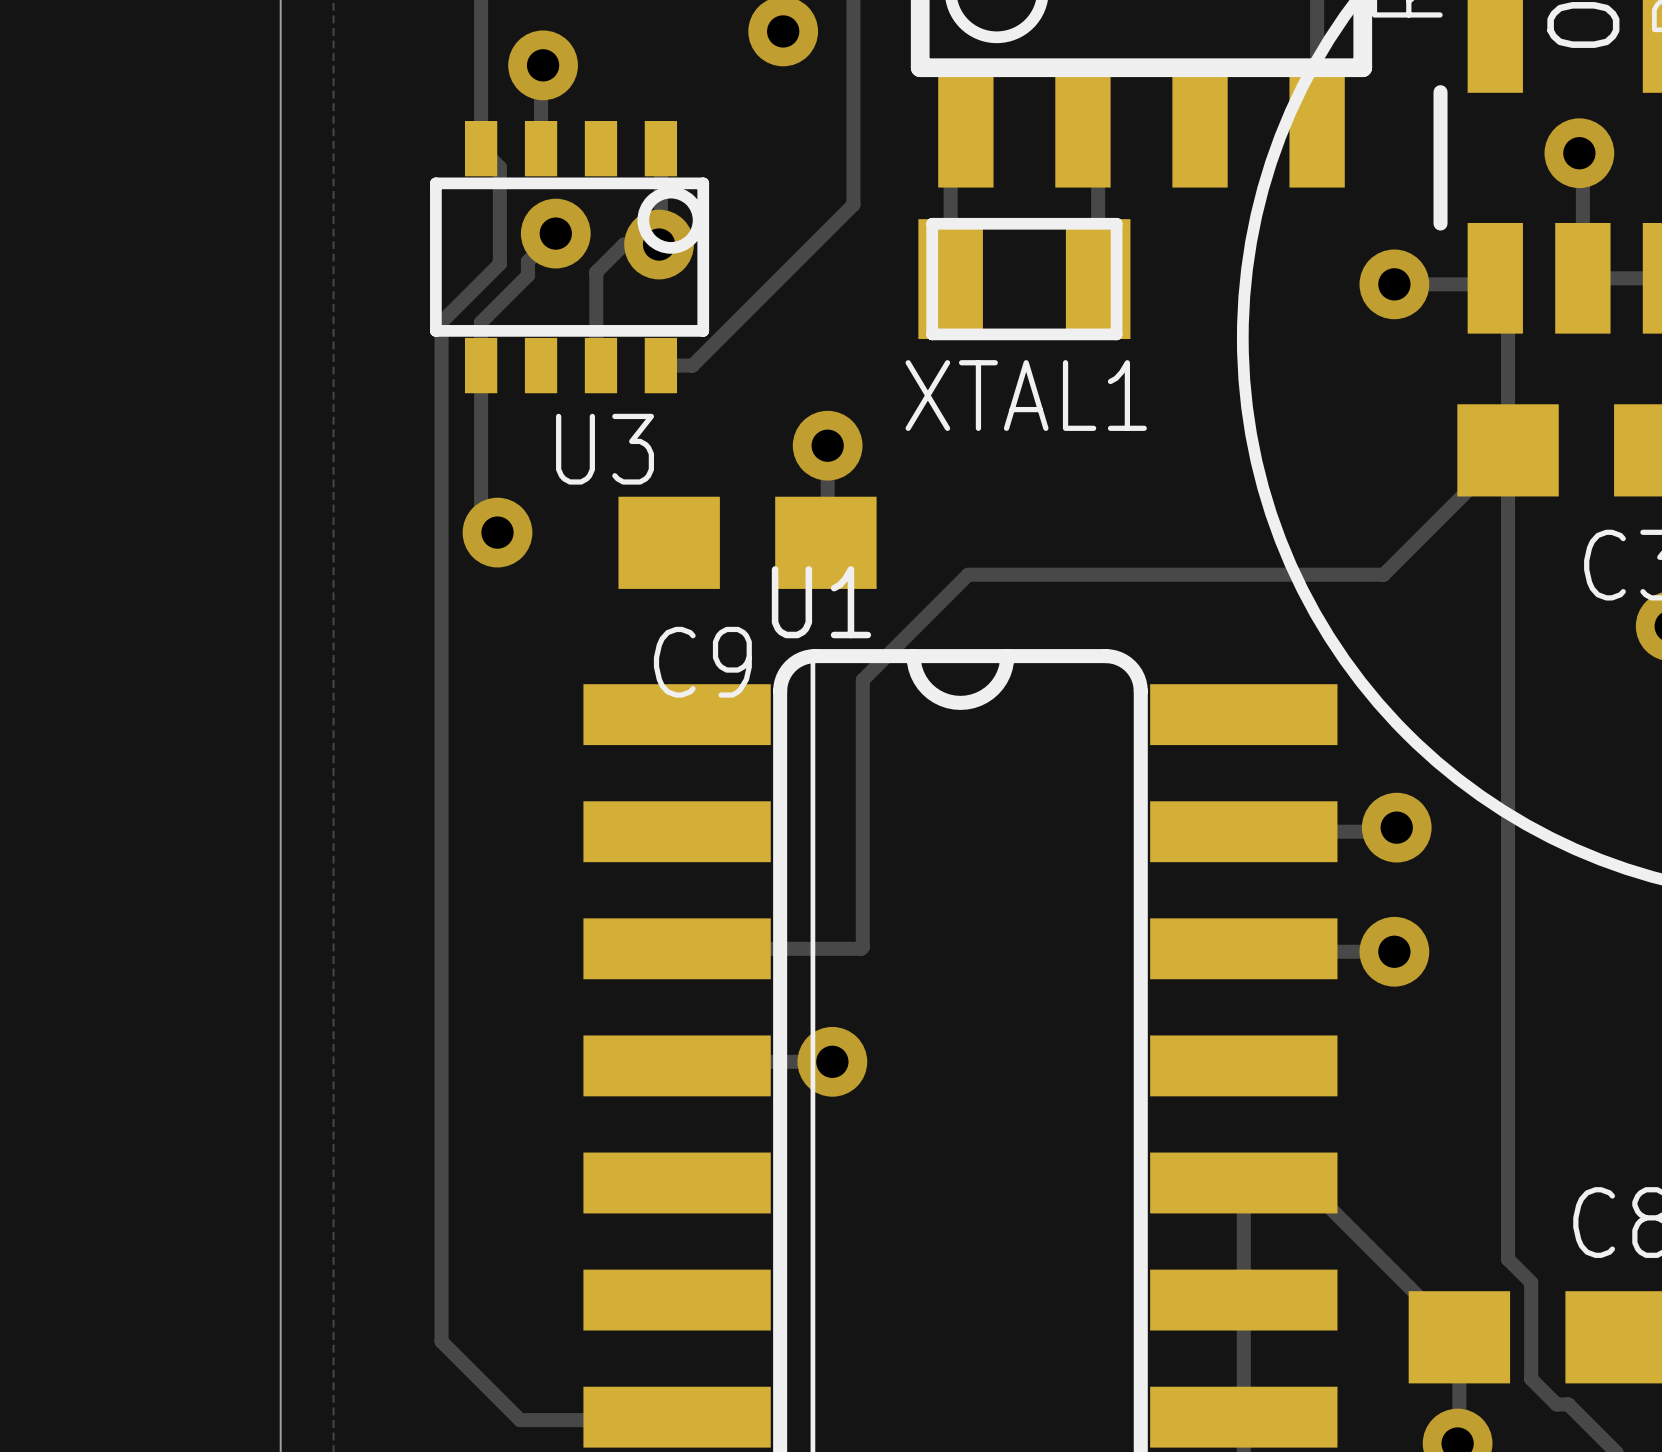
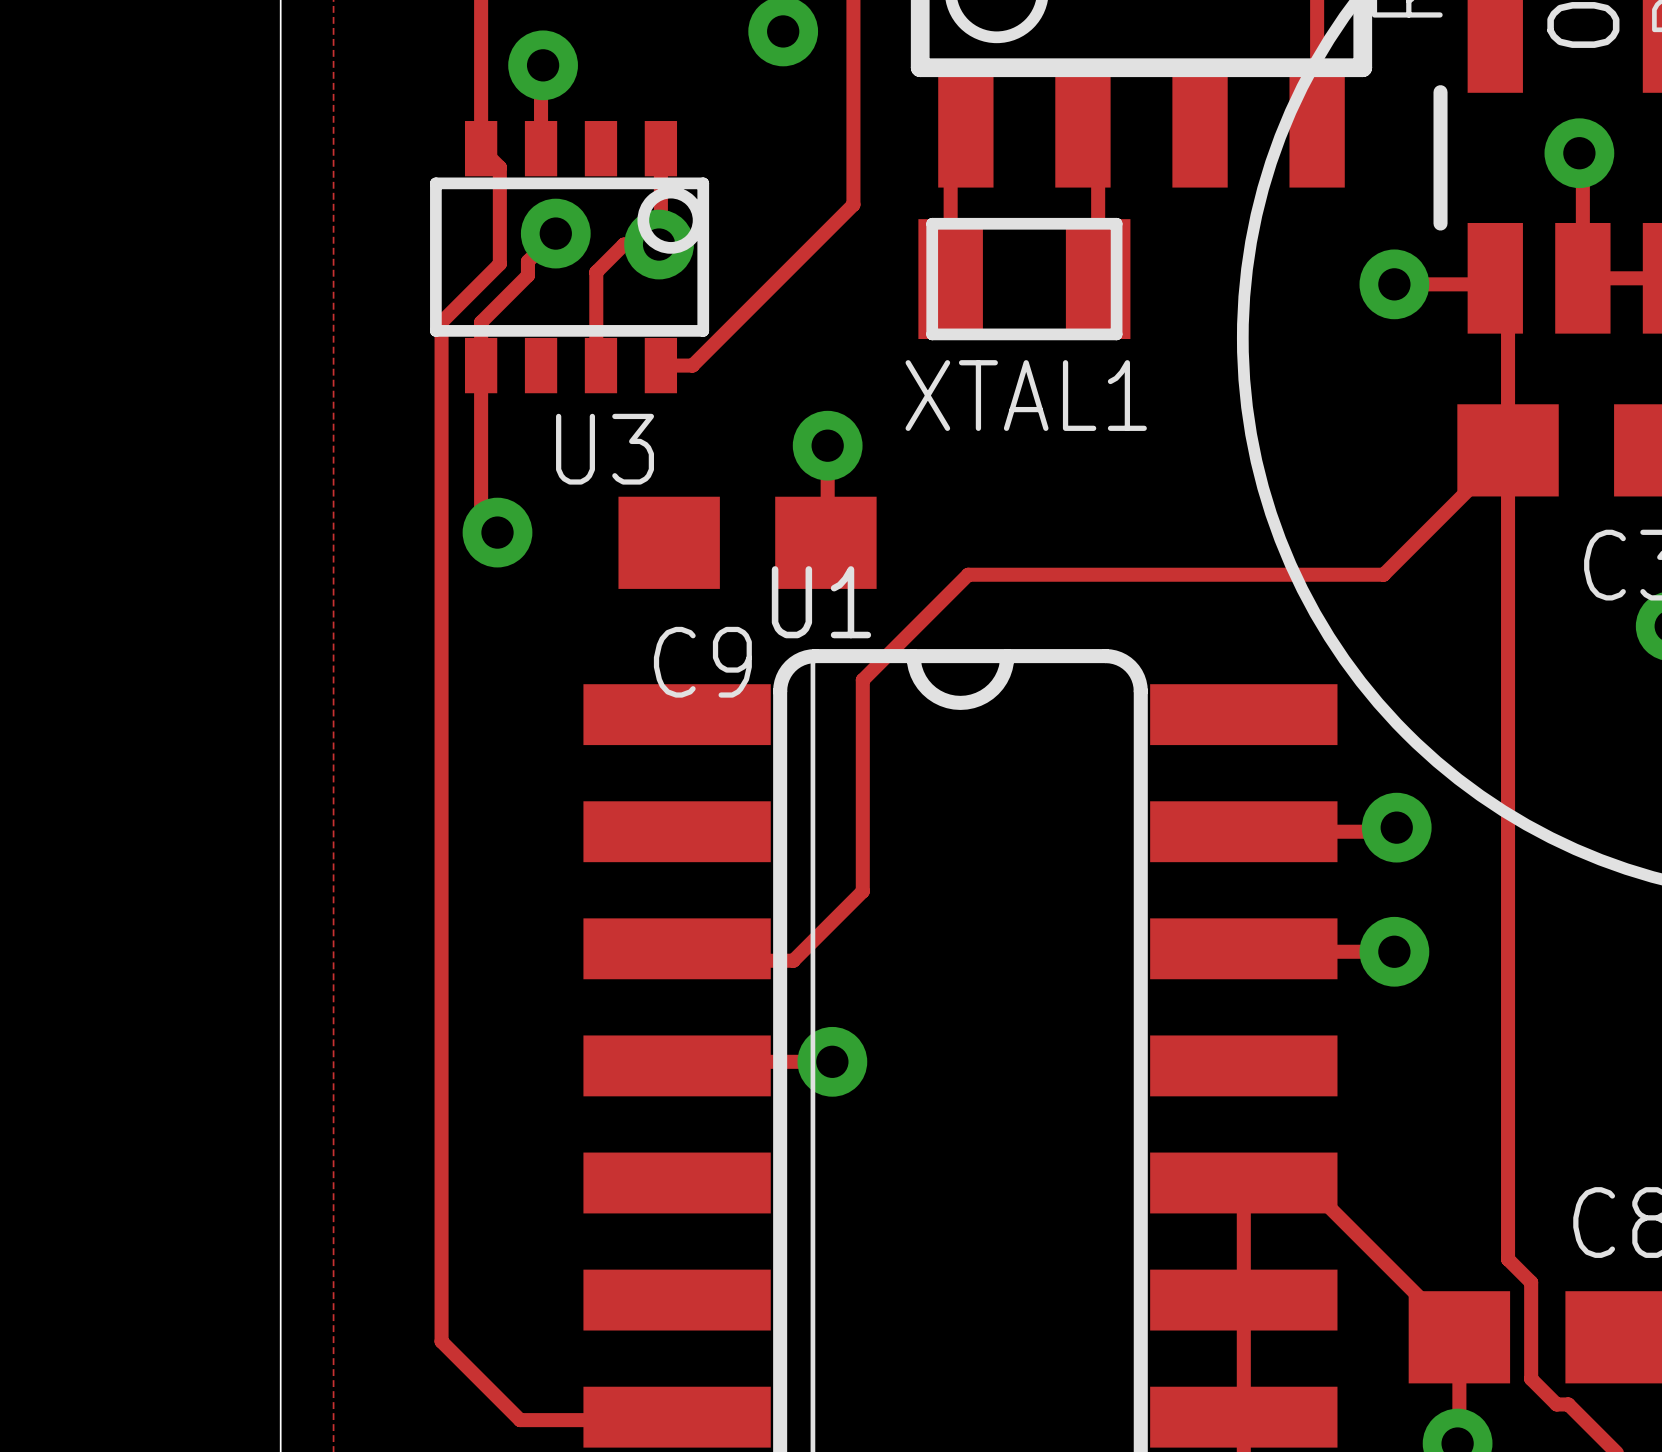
track: (862, 891) (862, 947) (861, 948) (677, 948) -> (862, 891) (793, 960) (689, 960) (677, 948)

